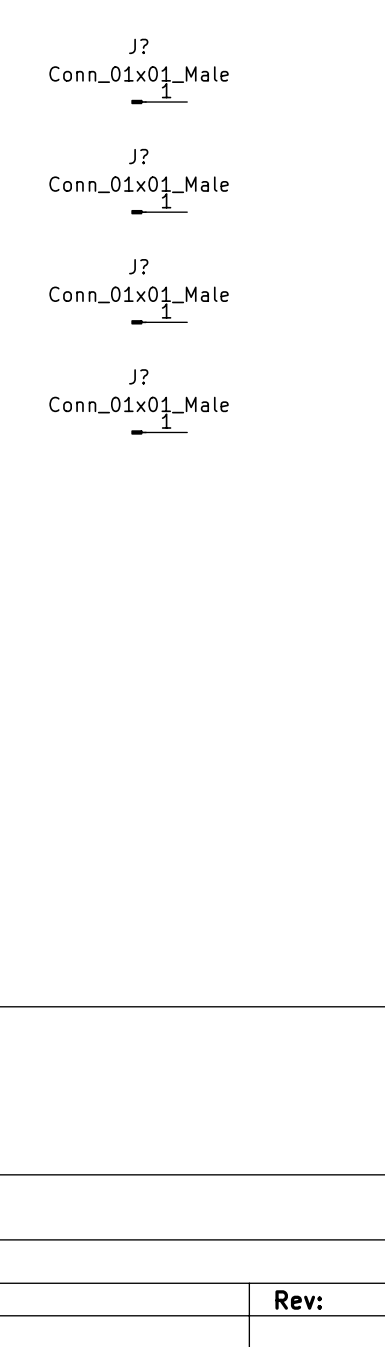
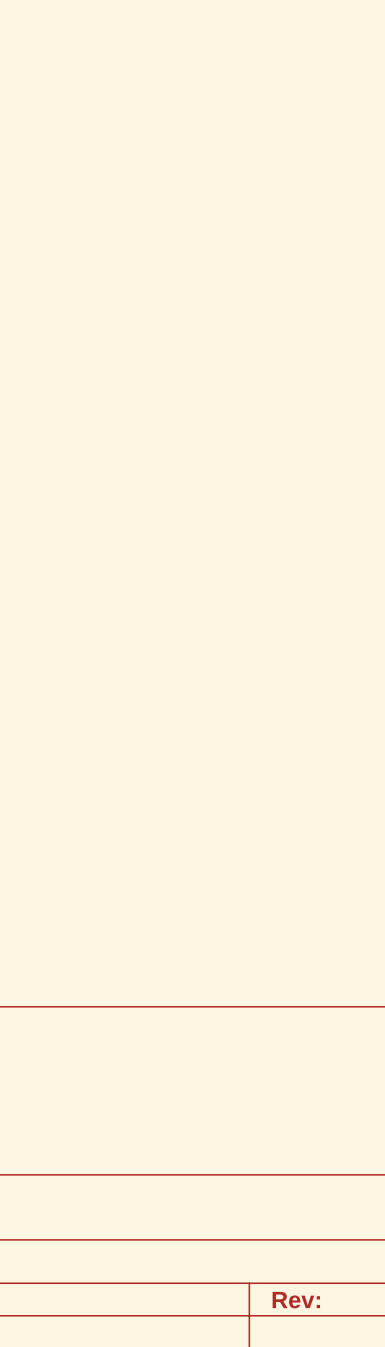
J?: Conn_01x01_Male (159, 102) -> none
J?: Conn_01x01_Male (159, 212) -> none
J?: Conn_01x01_Male (159, 322) -> none
J?: Conn_01x01_Male (159, 432) -> none

